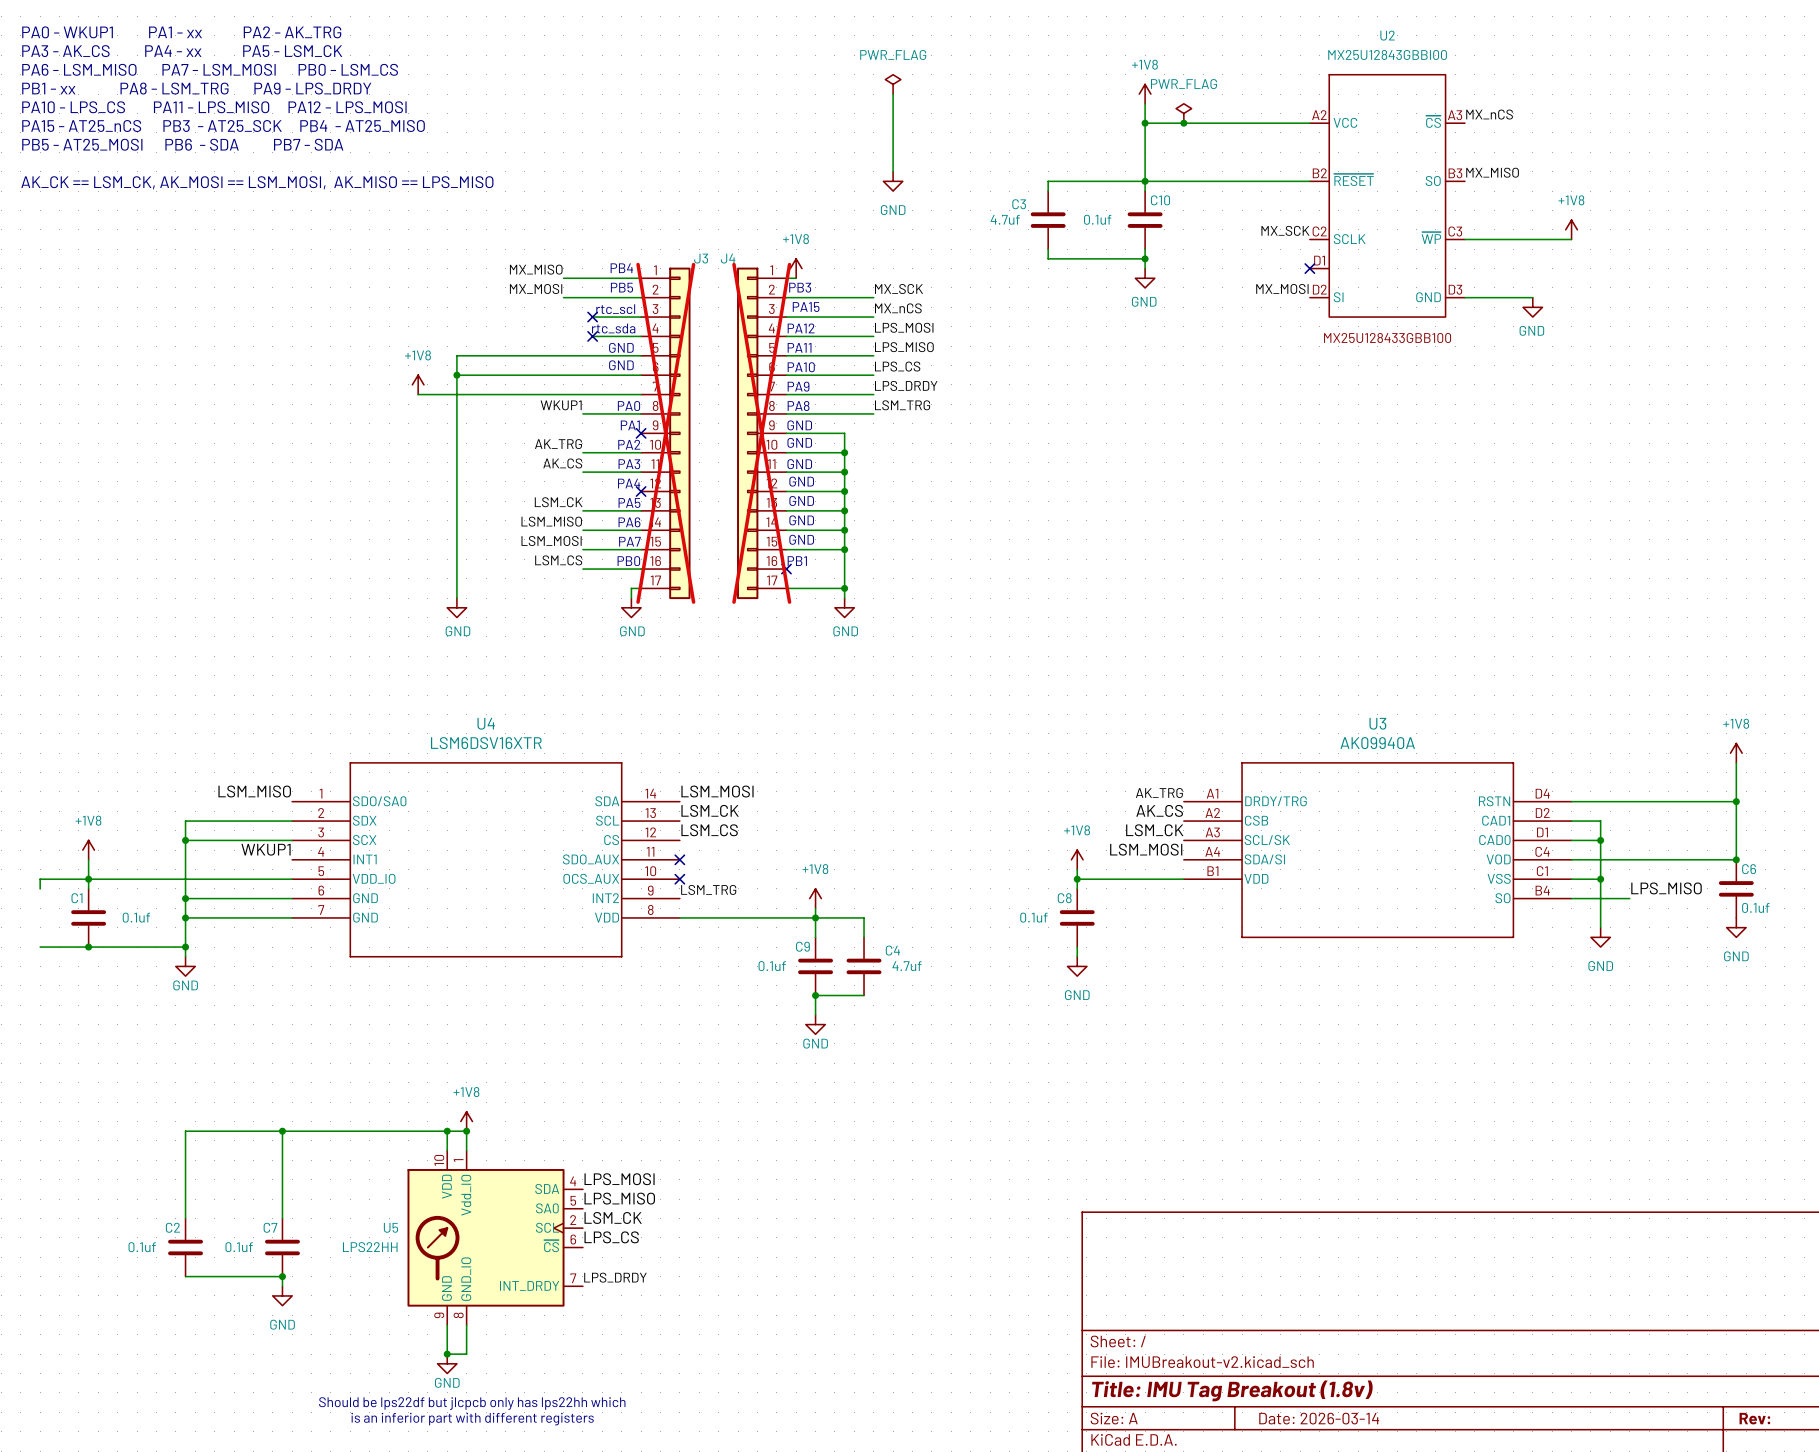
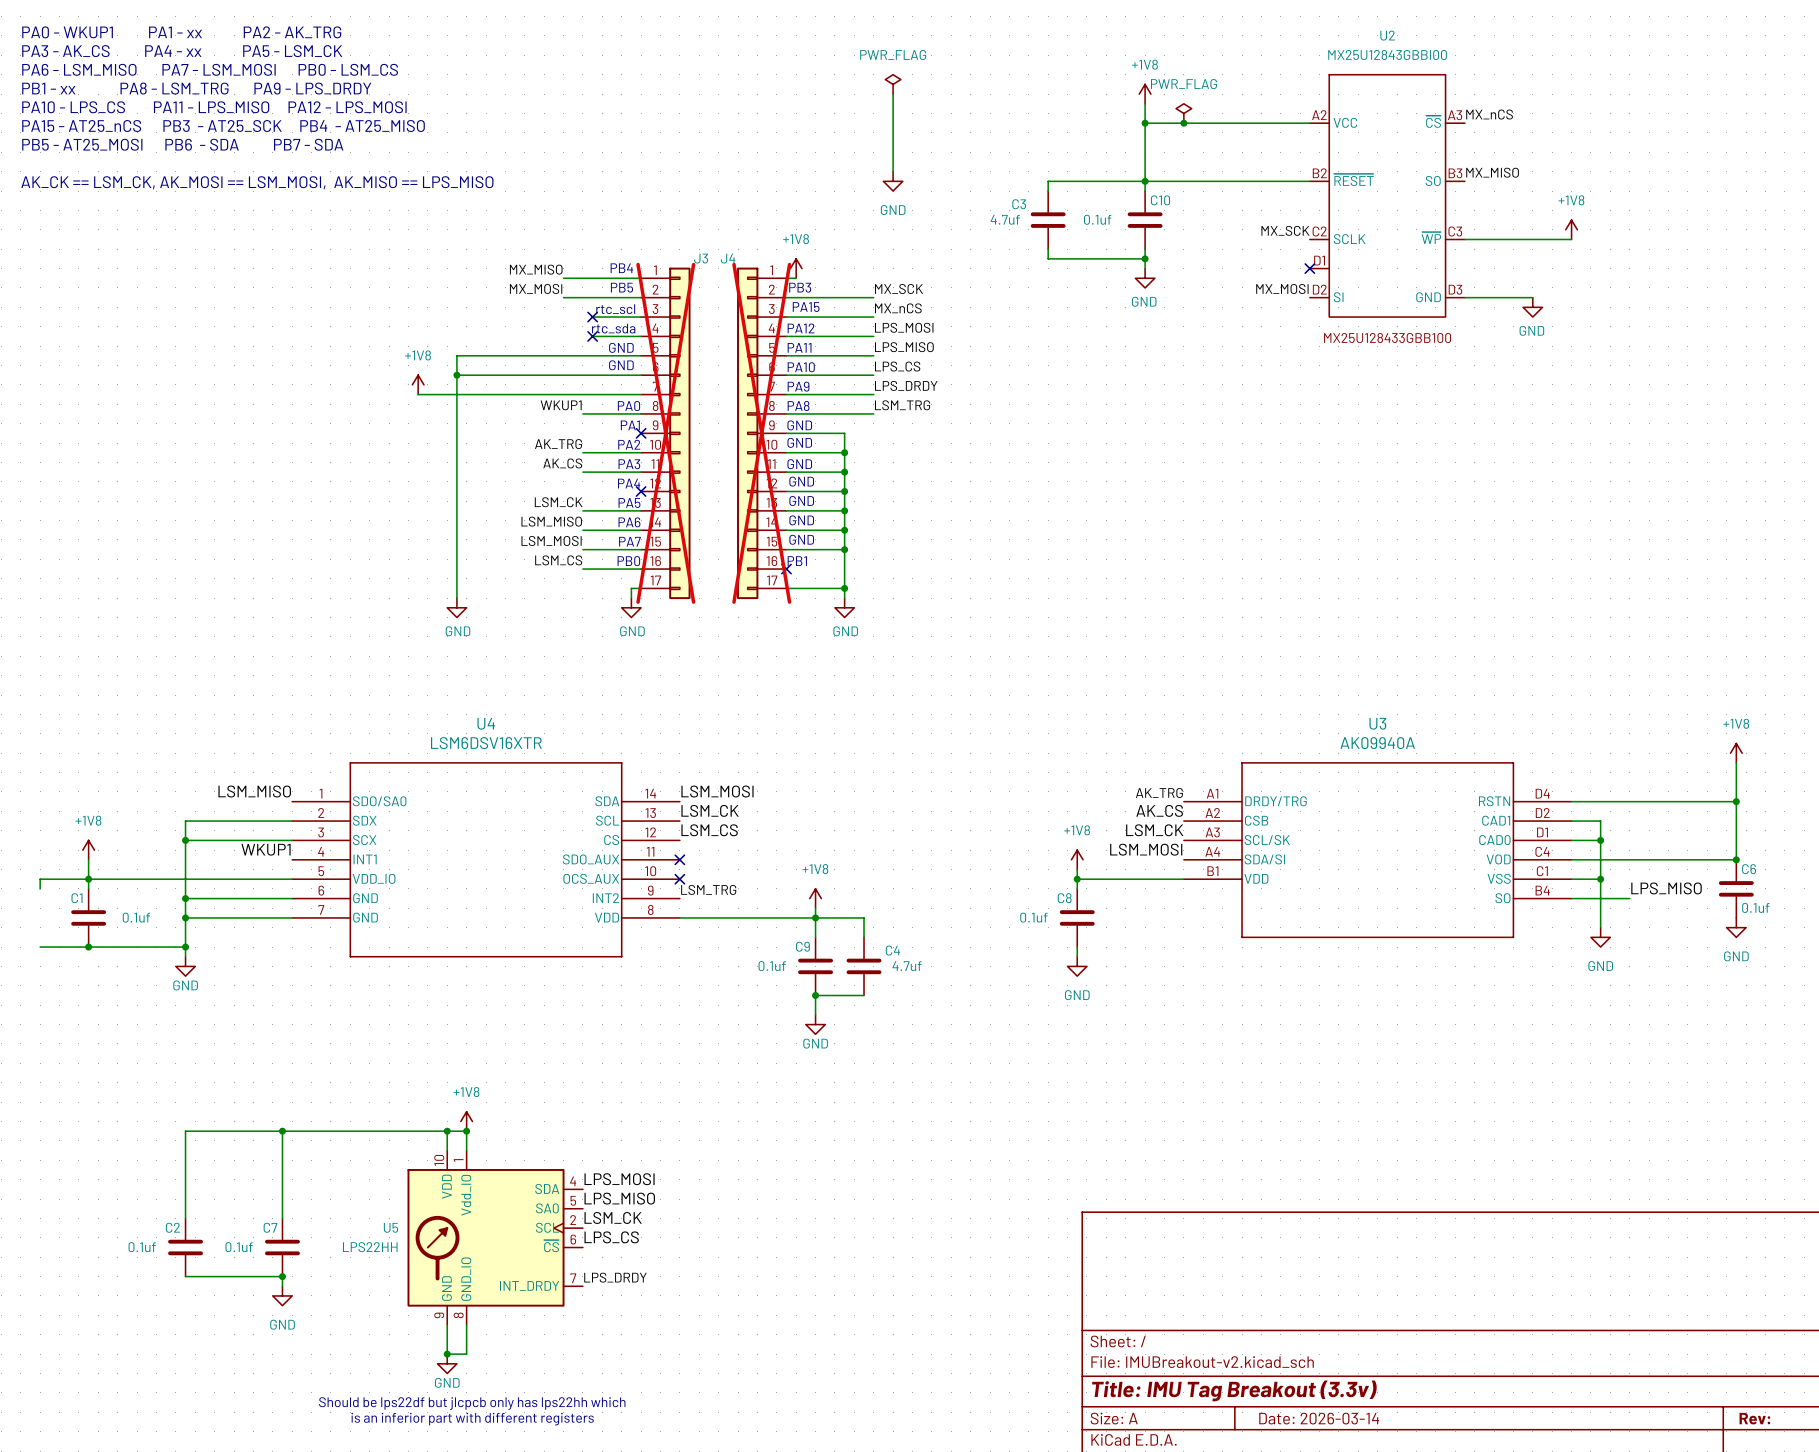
title block: Title: IMU Tag Breakout (1.8v) (1232, 1390) -> Title: IMU Tag Breakout (3.3v) (1234, 1390)

